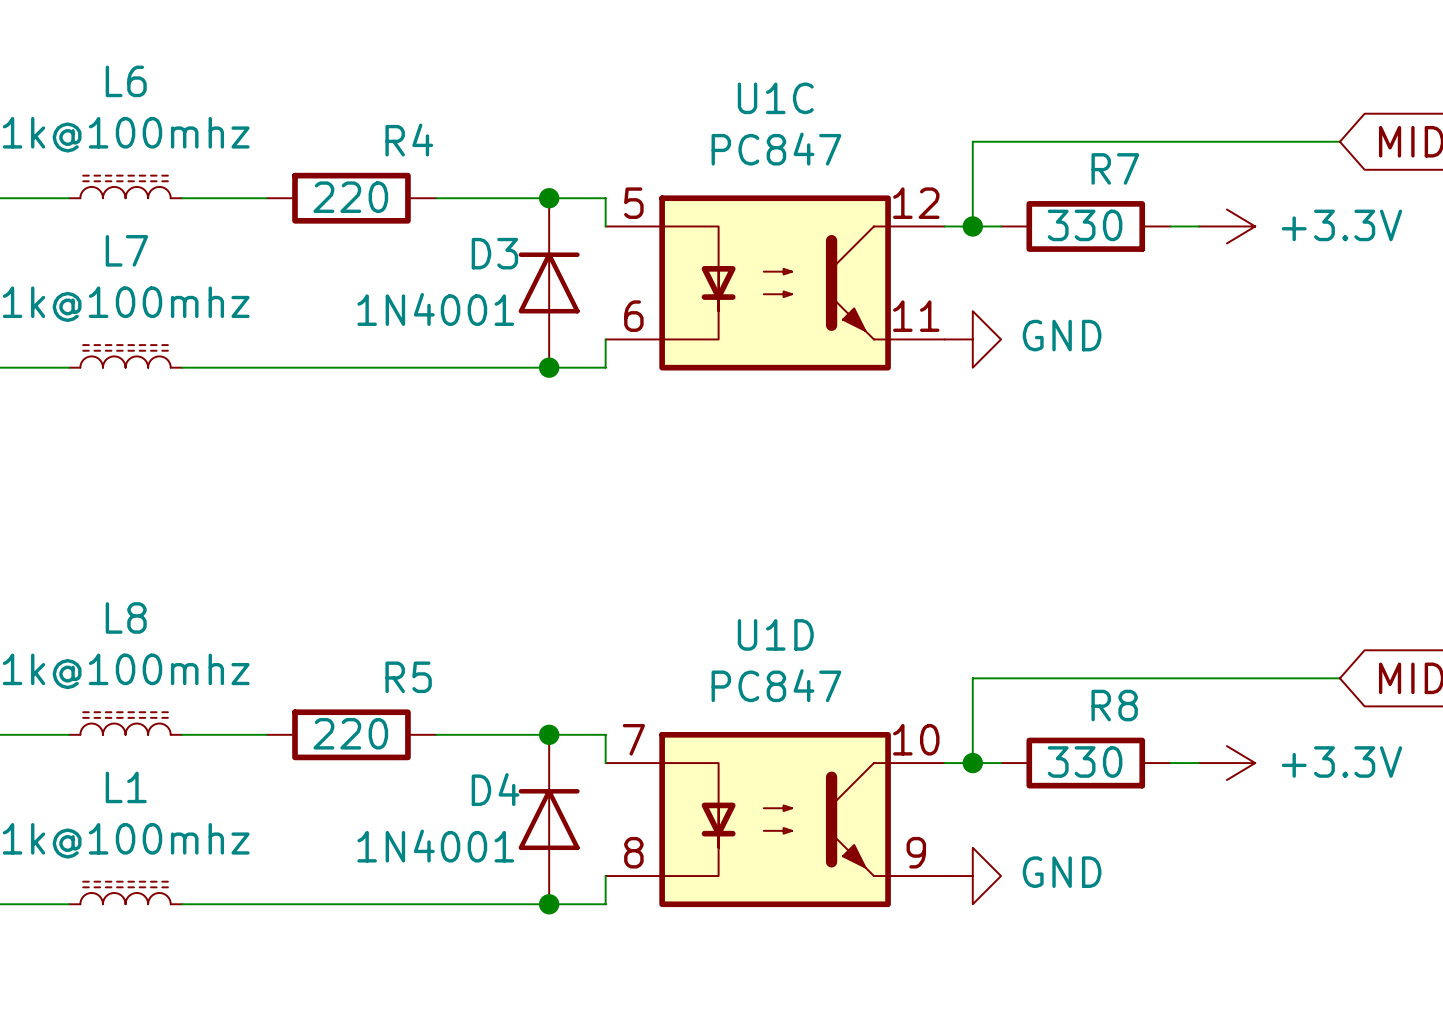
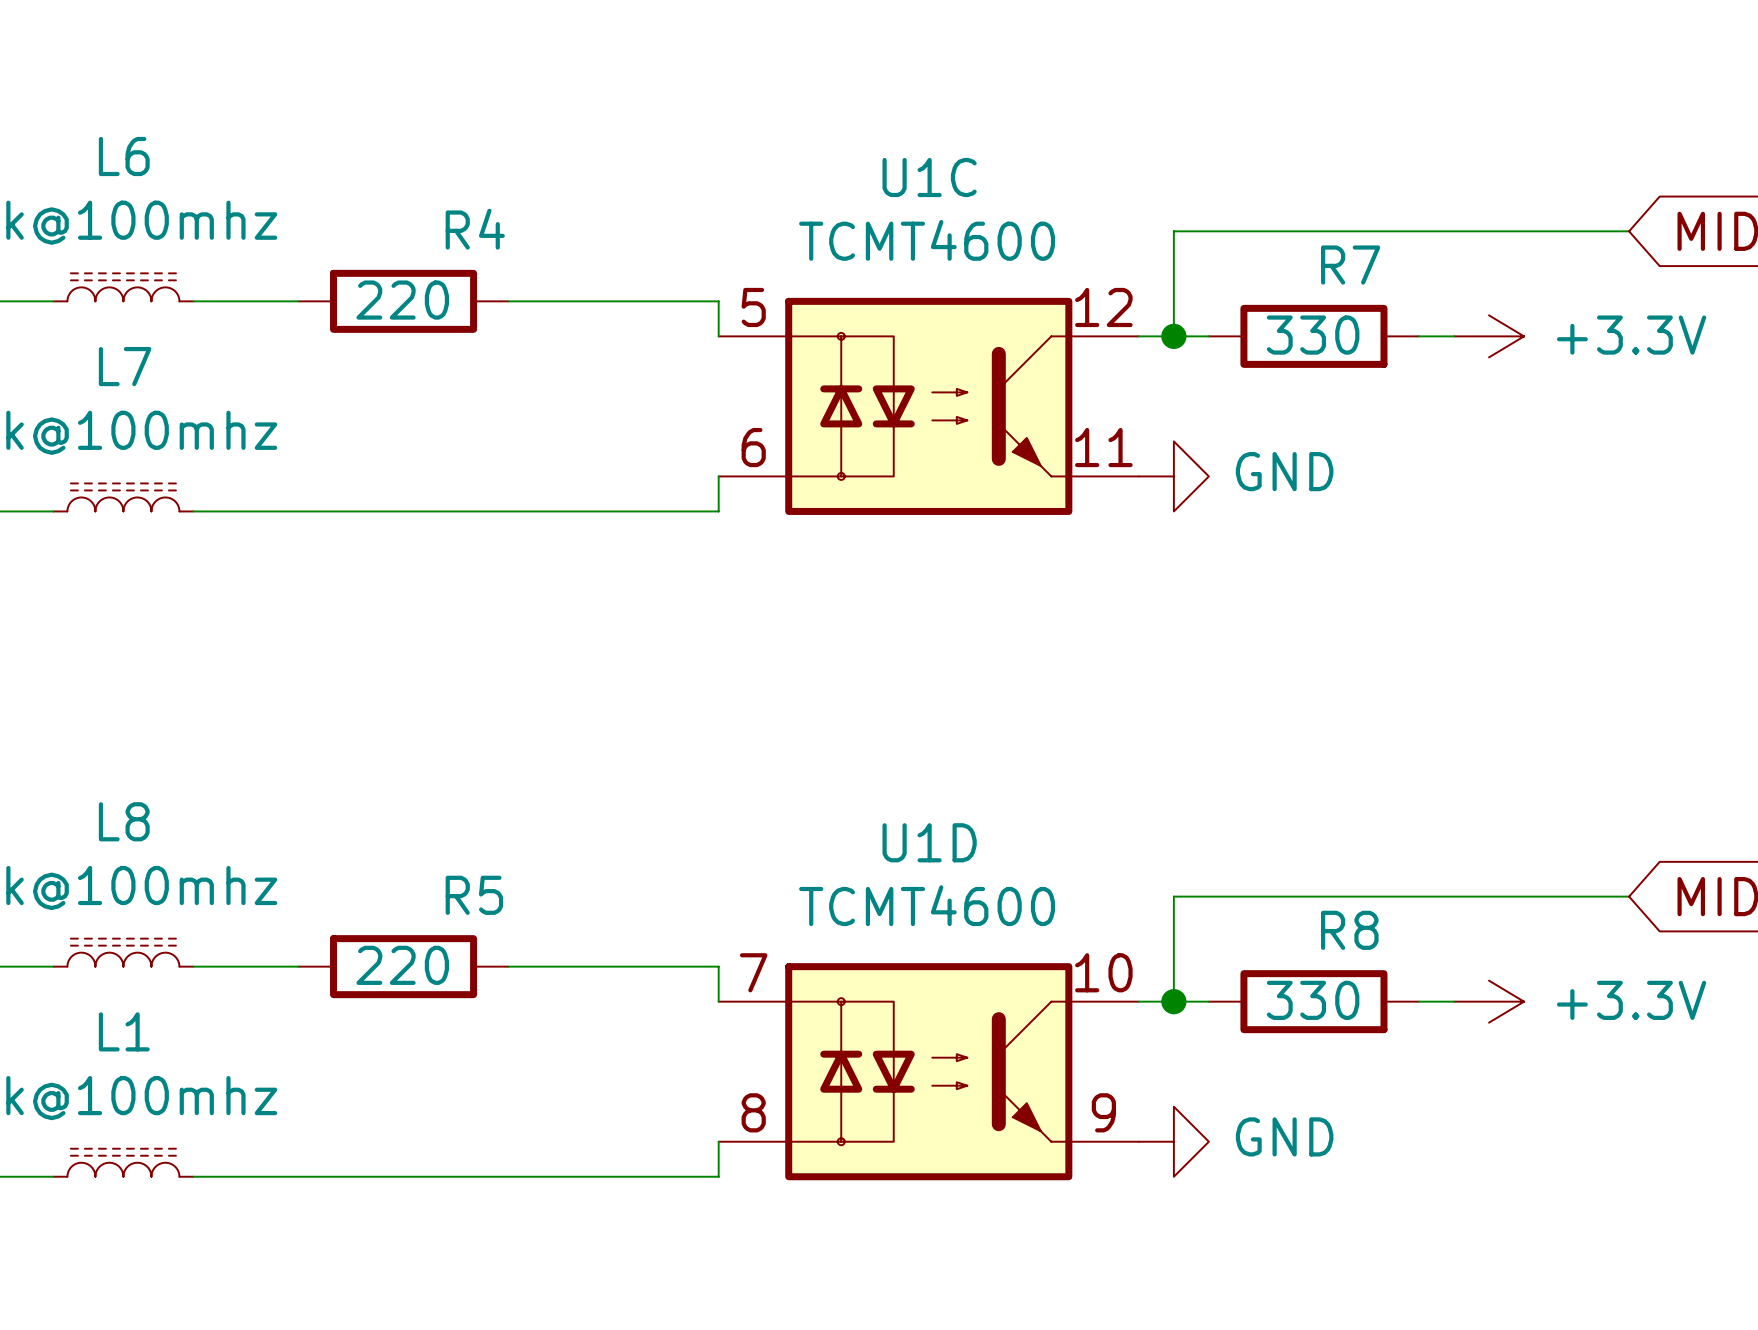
U1C value: PC847 (776, 149) -> TCMT4600 (927, 240)
U1C symbol: [605, 195, 945, 371] -> [718, 297, 1139, 515]
junction: (549, 198) -> none
D3: 1N4001 (549, 282) -> none
junction: (549, 367) -> none
U1D value: PC847 (776, 685) -> TCMT4600 (927, 905)
U1D symbol: [605, 731, 945, 908] -> [718, 963, 1139, 1181]
junction: (549, 734) -> none
D4: 1N4001 (549, 819) -> none
junction: (549, 904) -> none

